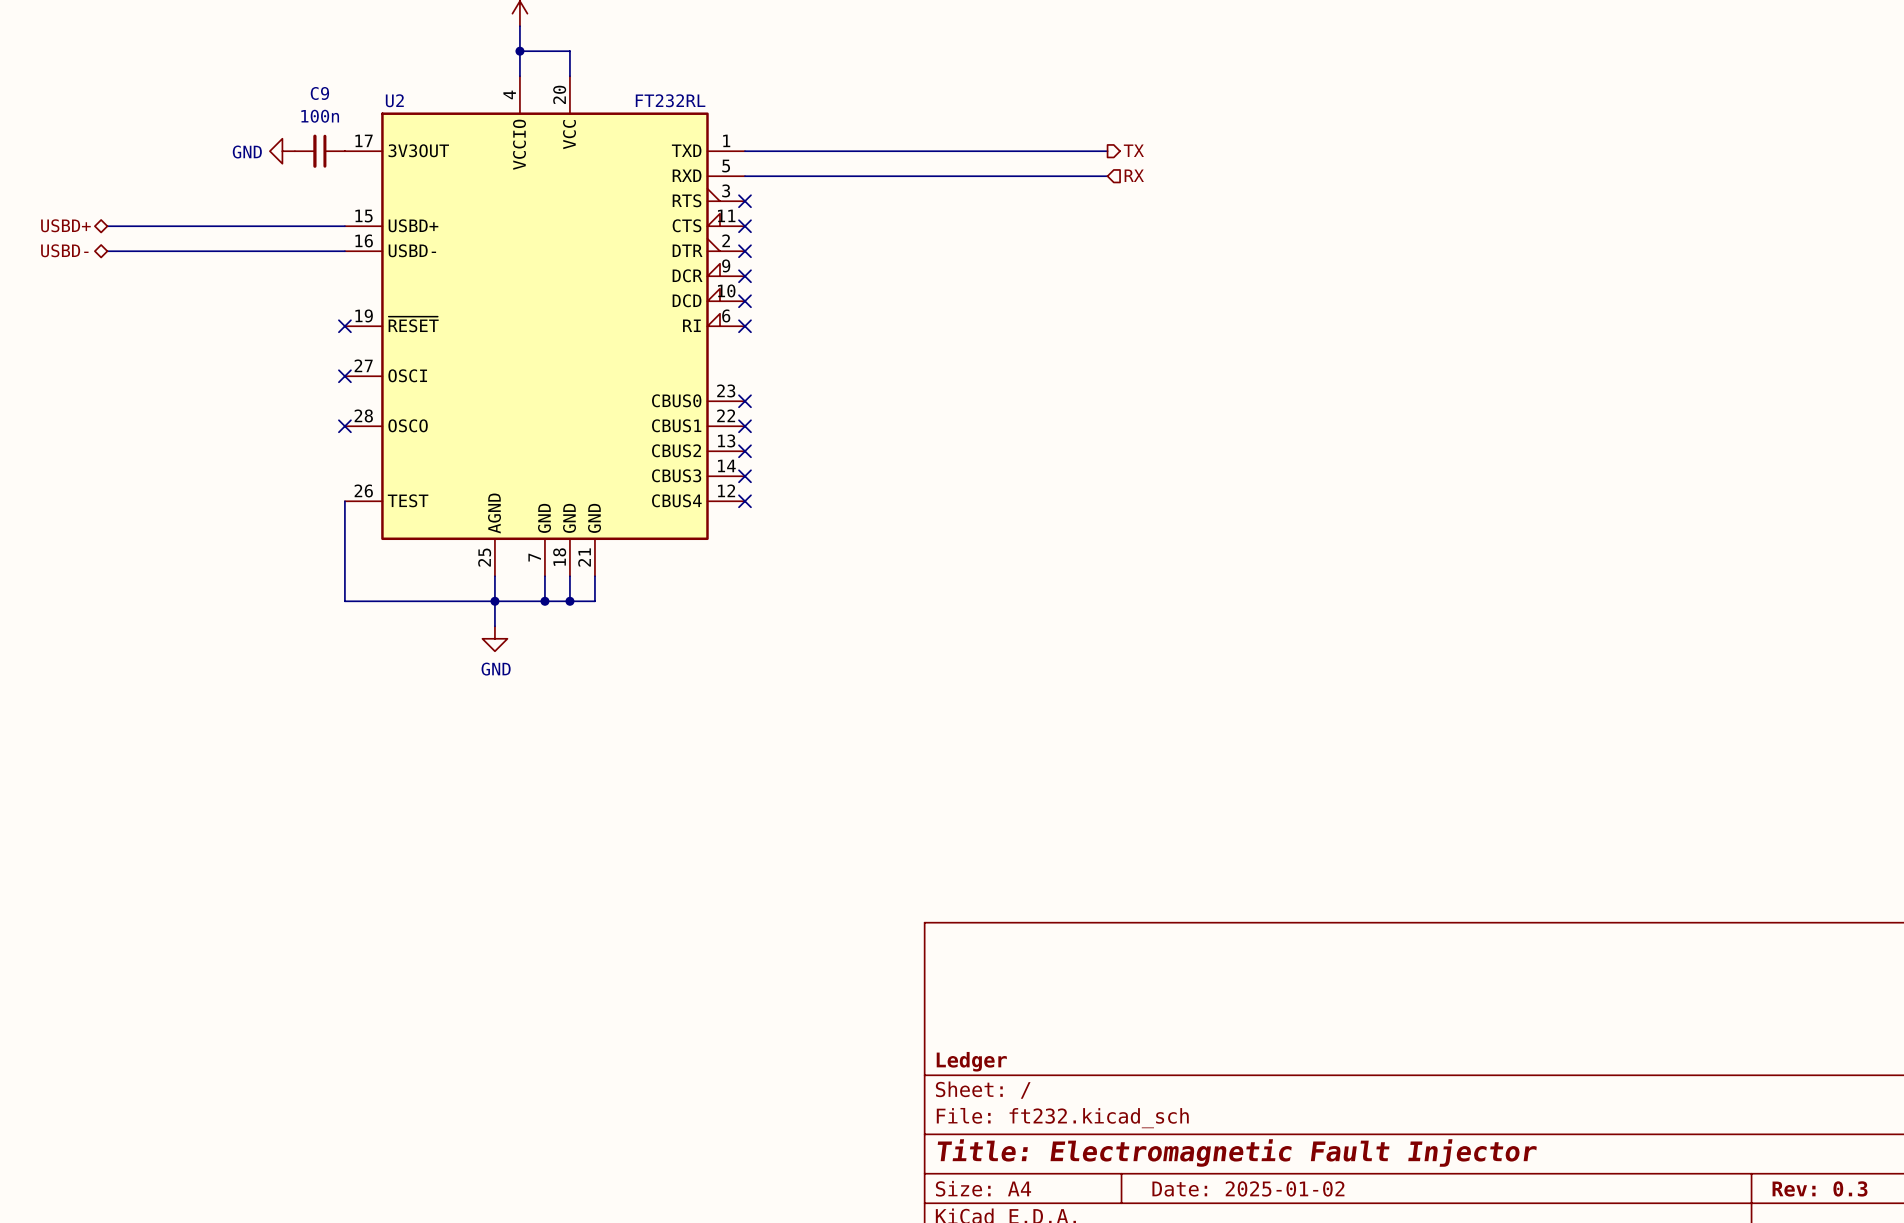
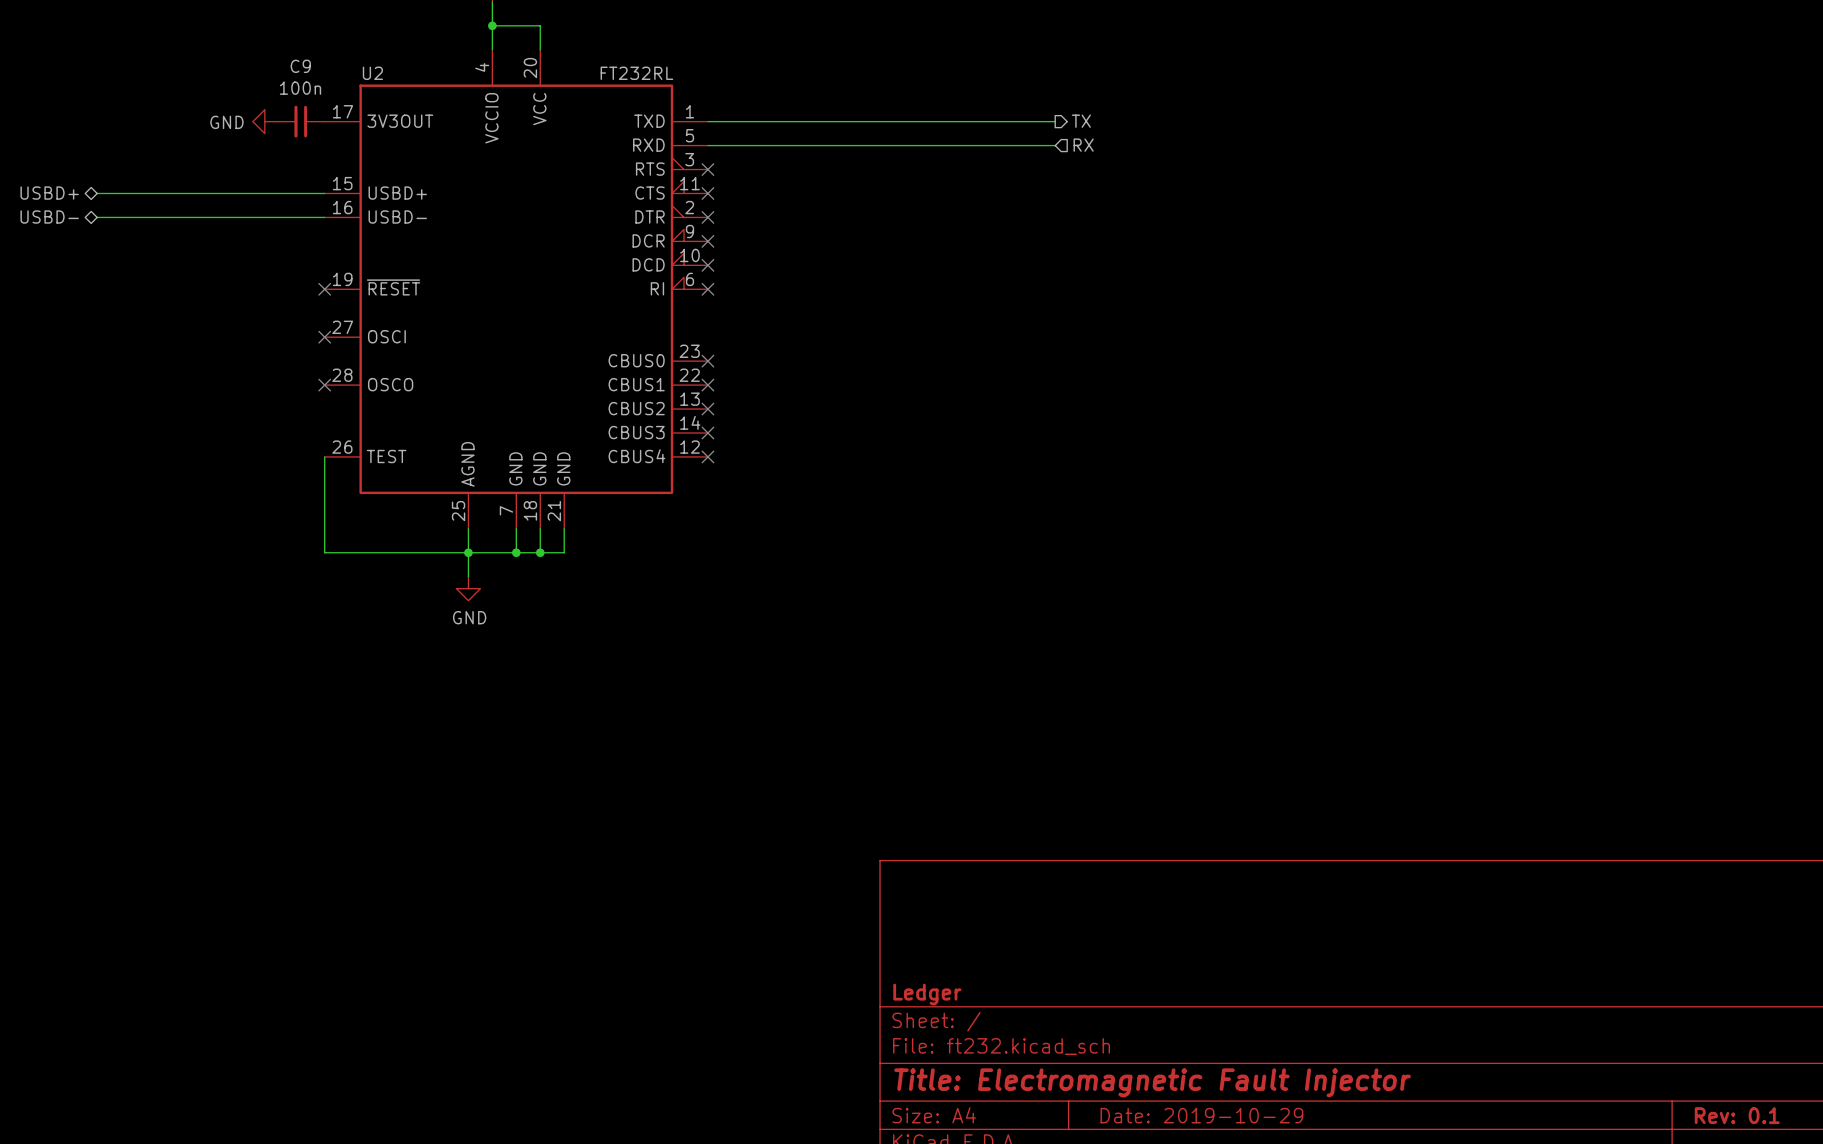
title block: Date: 2025-01-02 (1248, 1188) -> Date: 2019-10-29 (1201, 1115)
title block: Rev: 0.3 (1820, 1188) -> Rev: 0.1 (1737, 1115)

